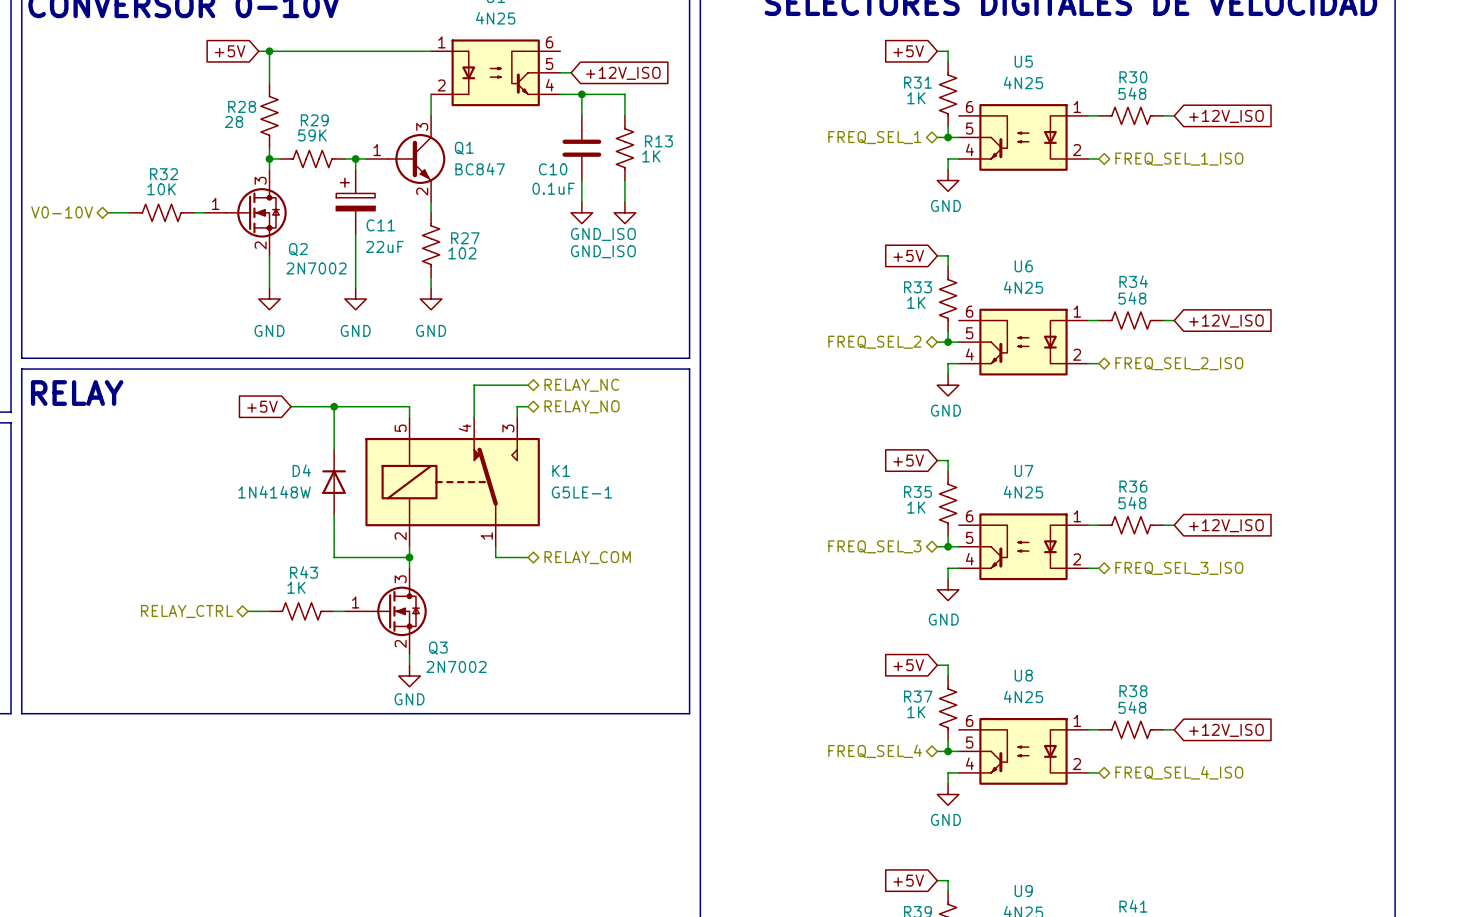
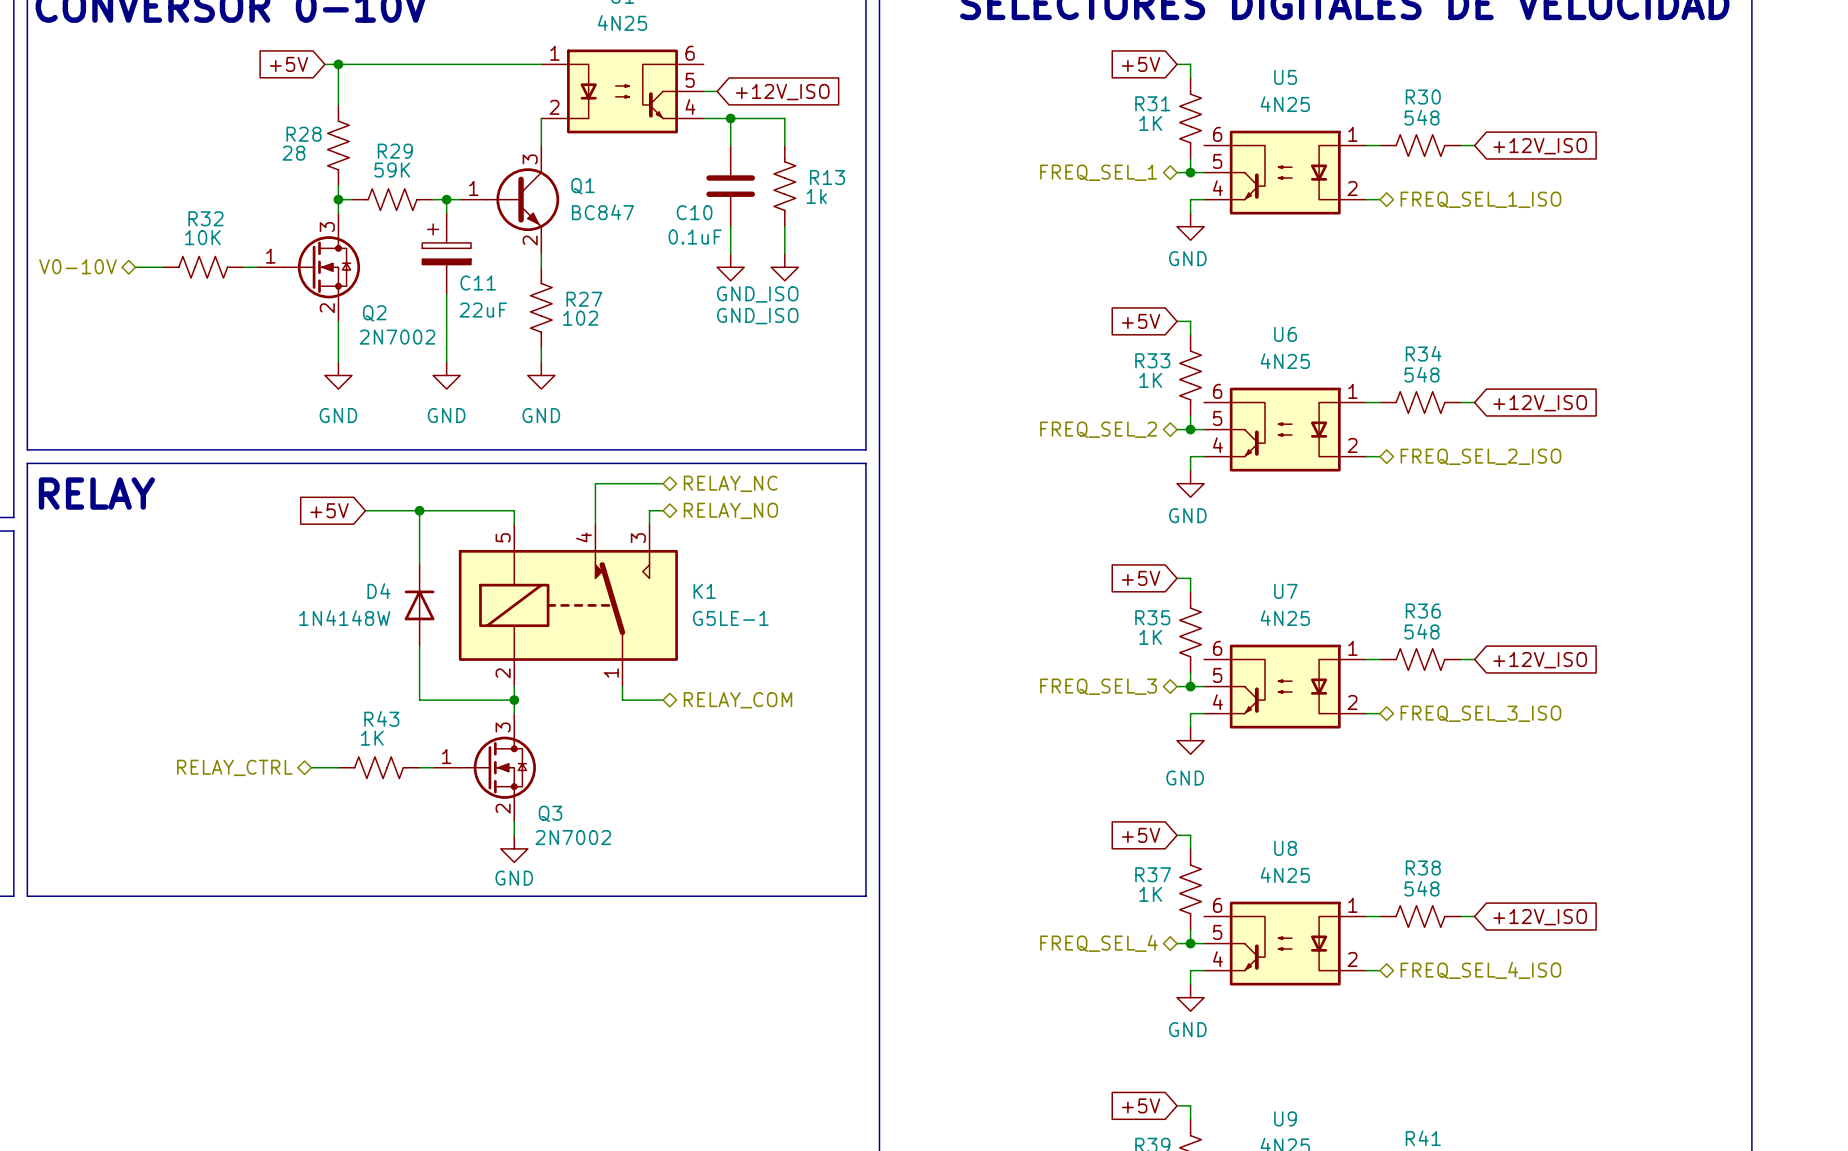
R13 value: 1K (651, 156) -> 1k (816, 196)

